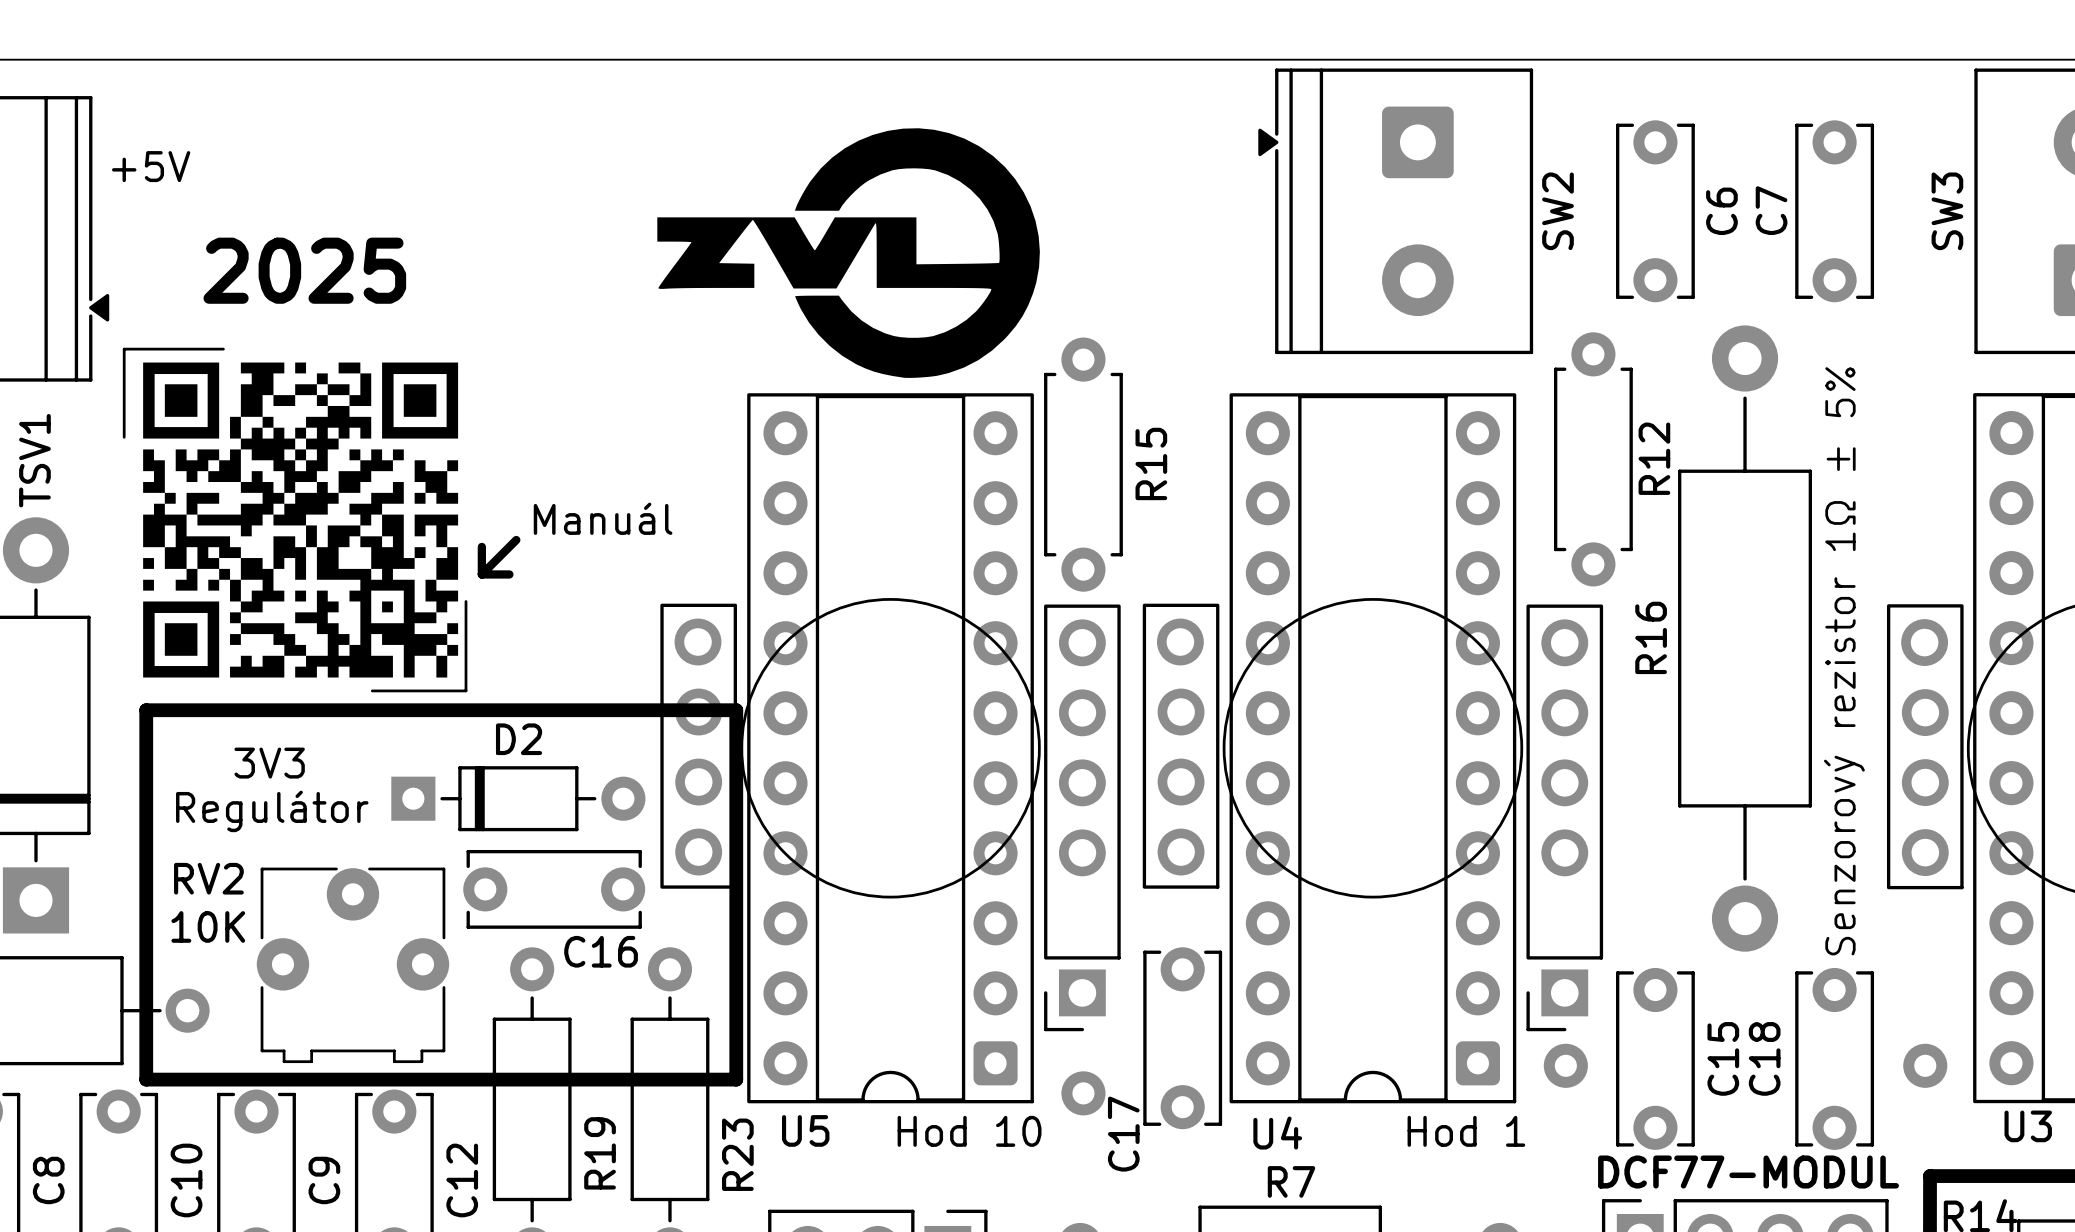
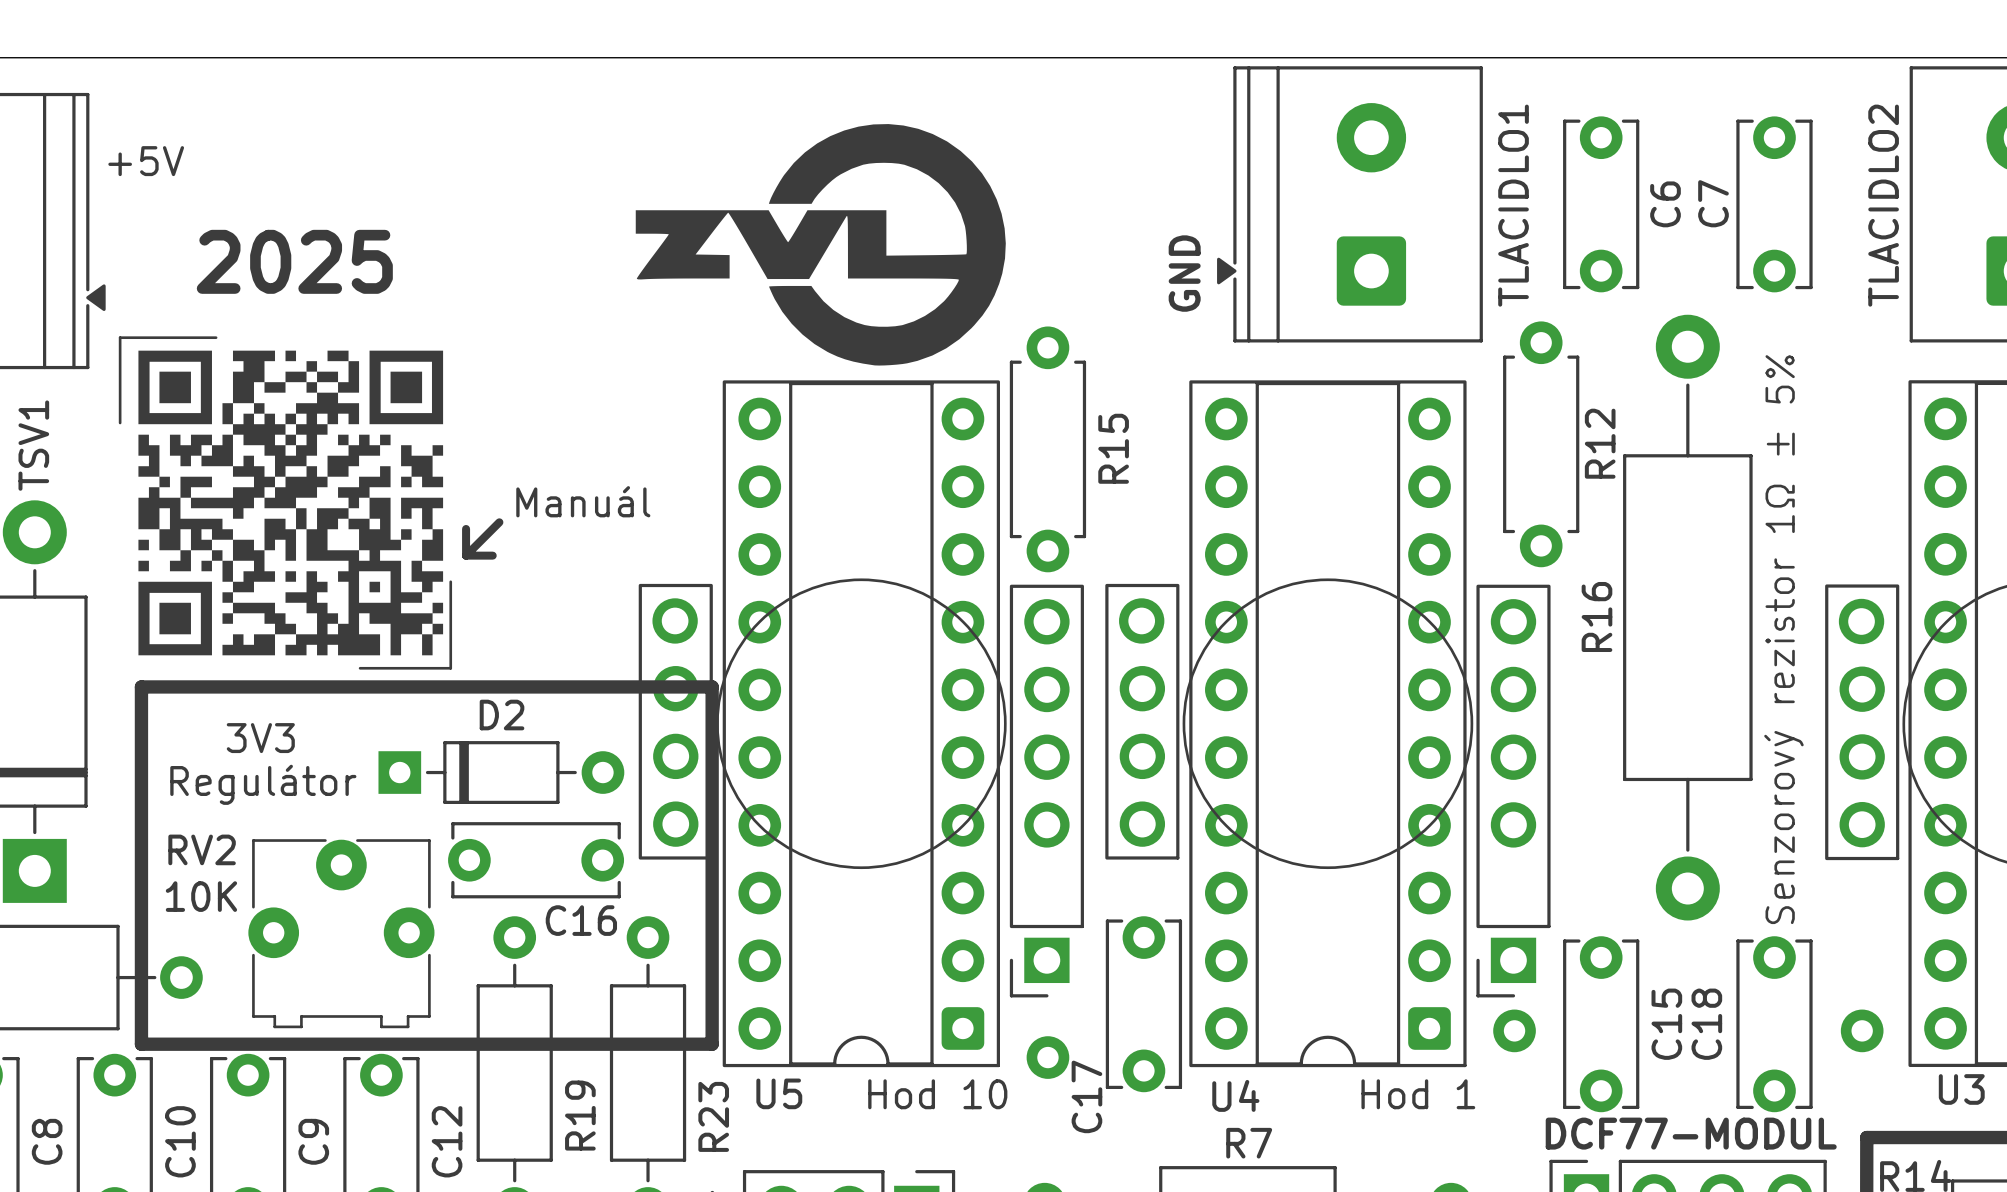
SW2: (1395, 211) -> none
TLACIDLO1: none -> (1349, 204)
SW3 name: SW3 (1947, 211) -> TLACIDLO2 (1883, 205)
text: none -> GND (1184, 273)

